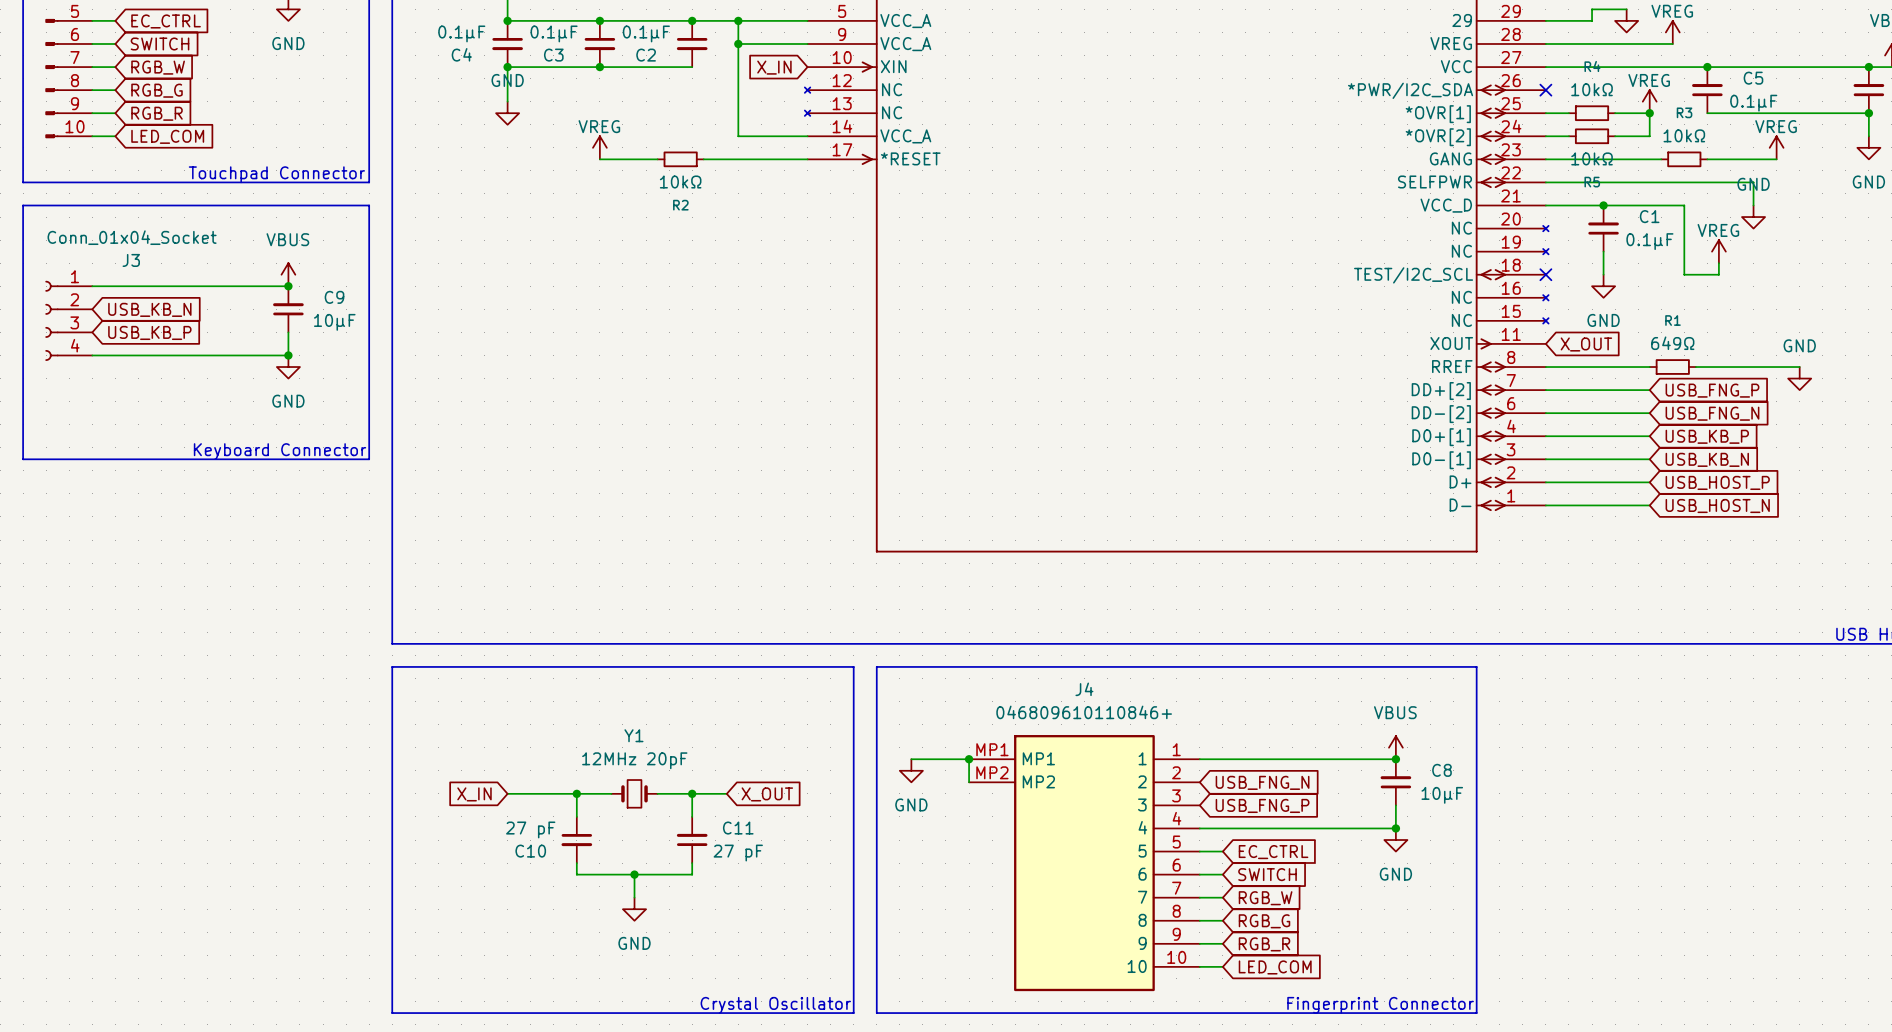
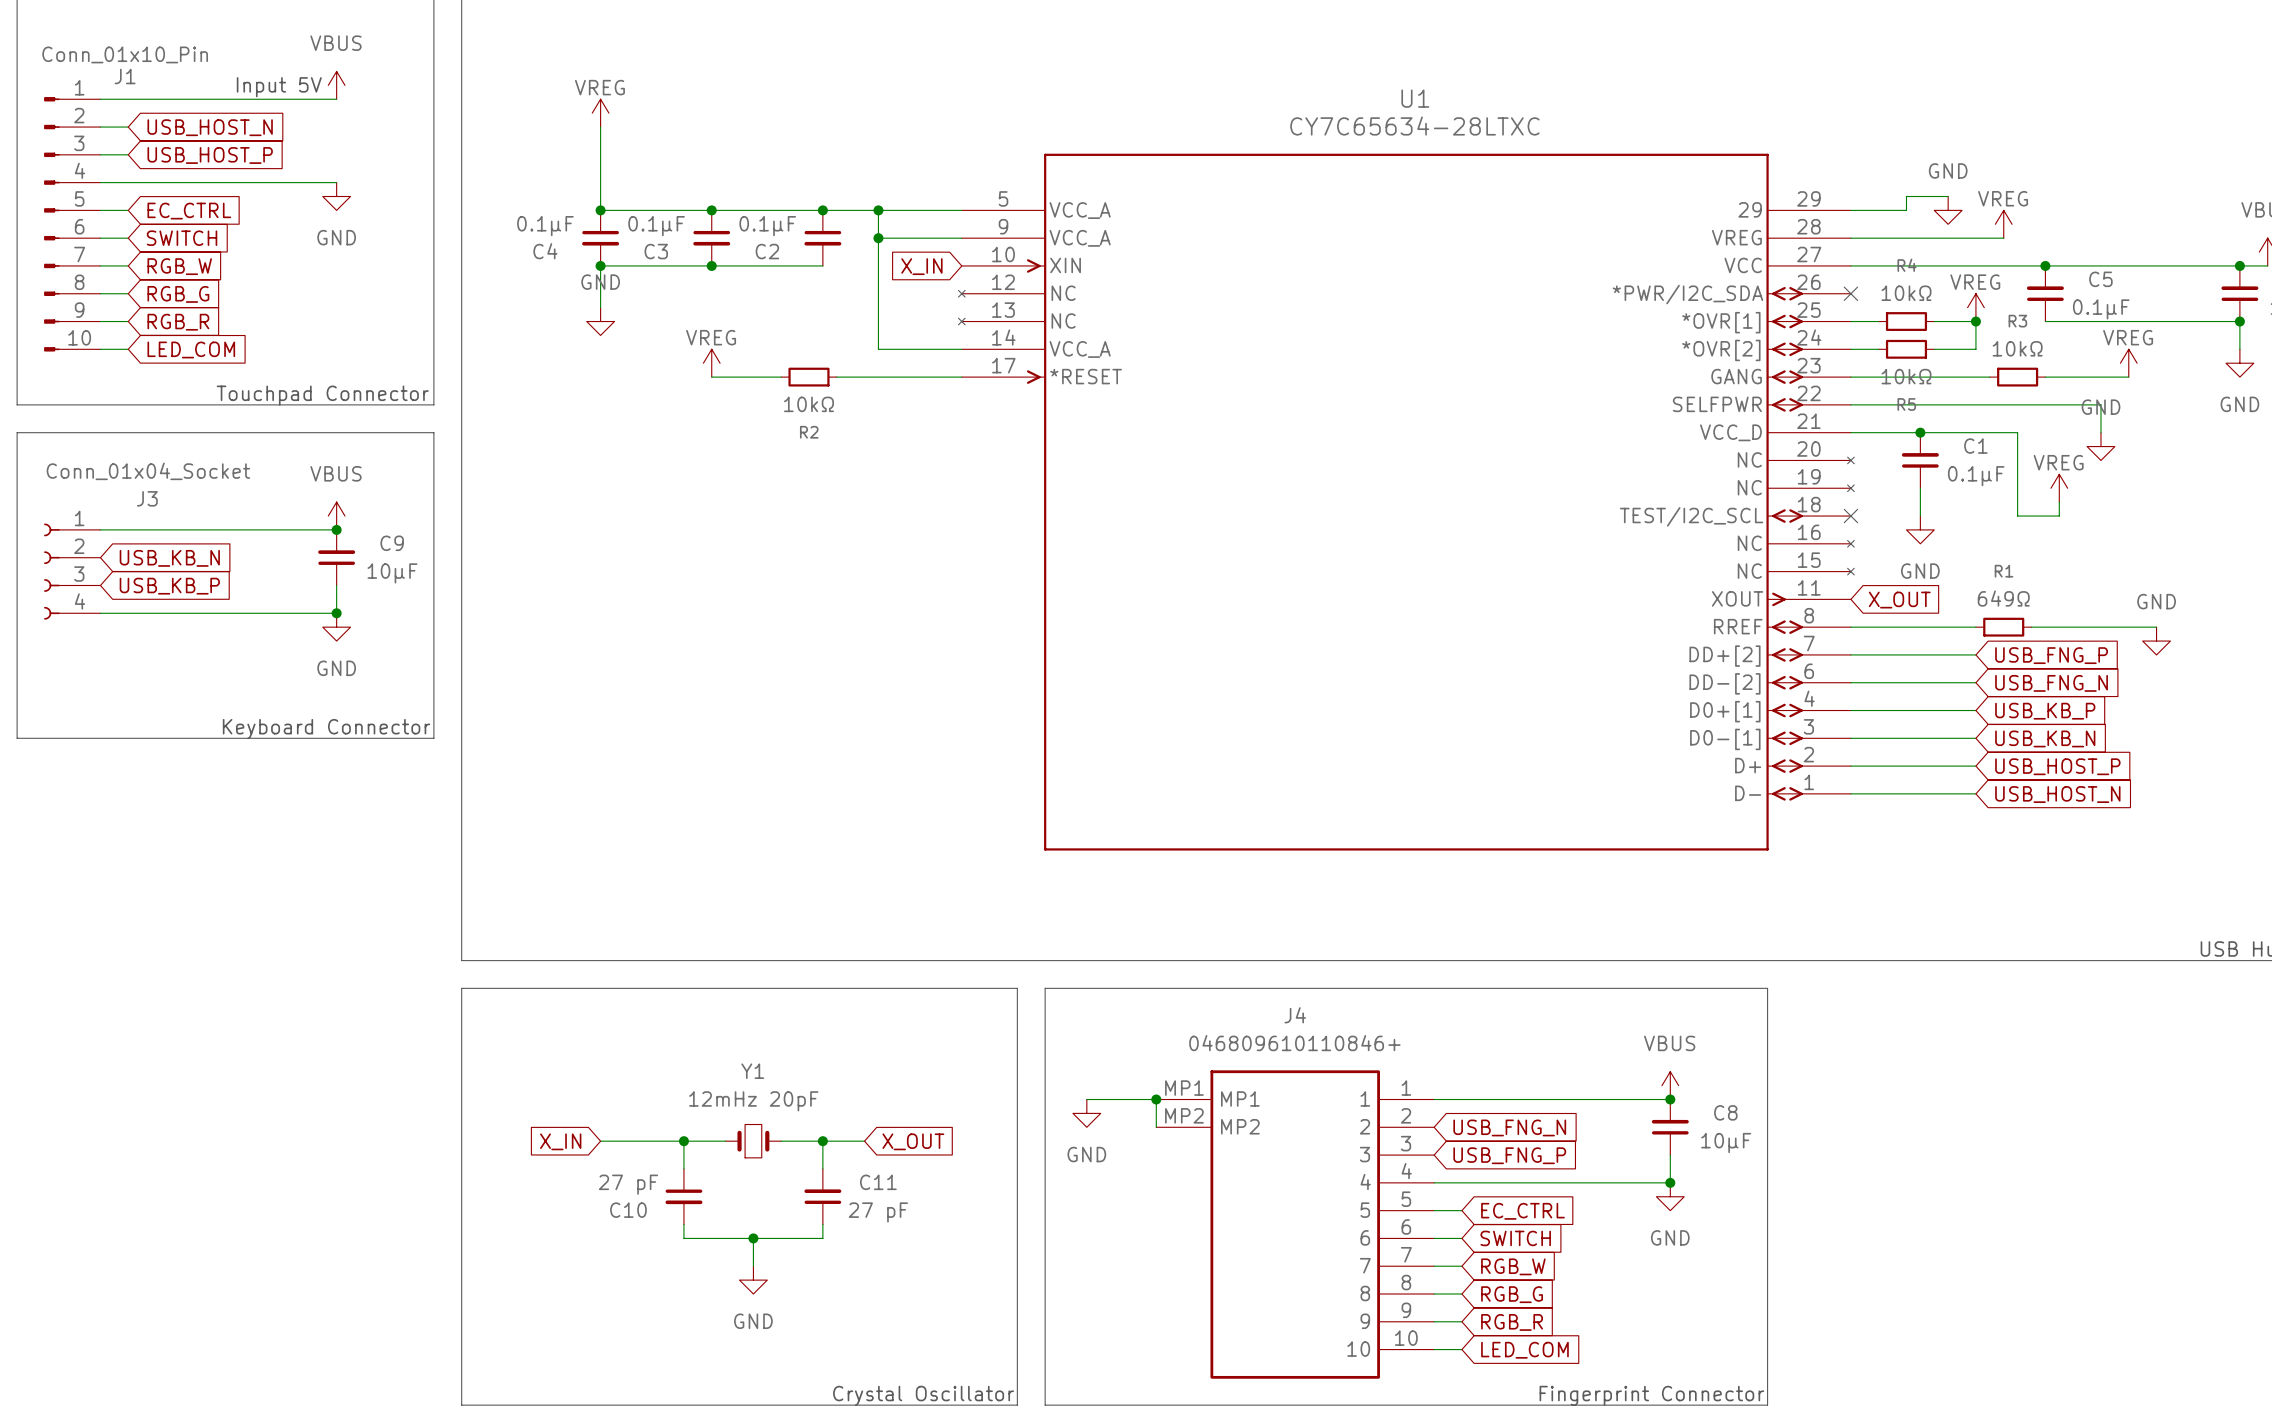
Y1 value: 12MHz 20pF (634, 760) -> 12mHz 20pF (753, 1101)

